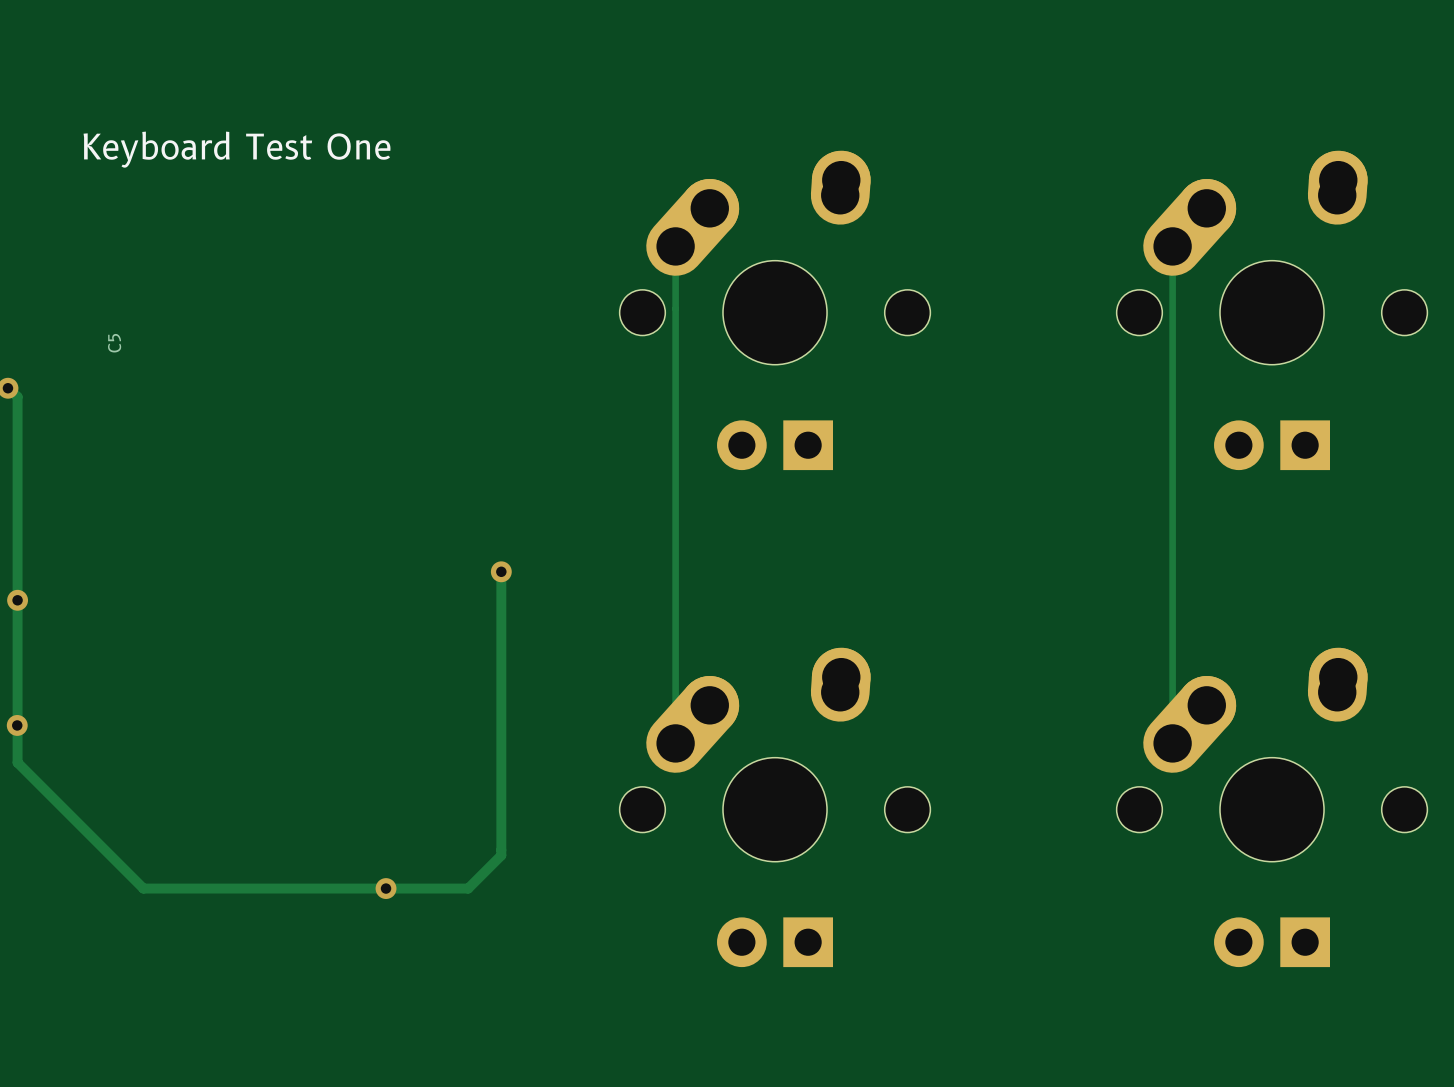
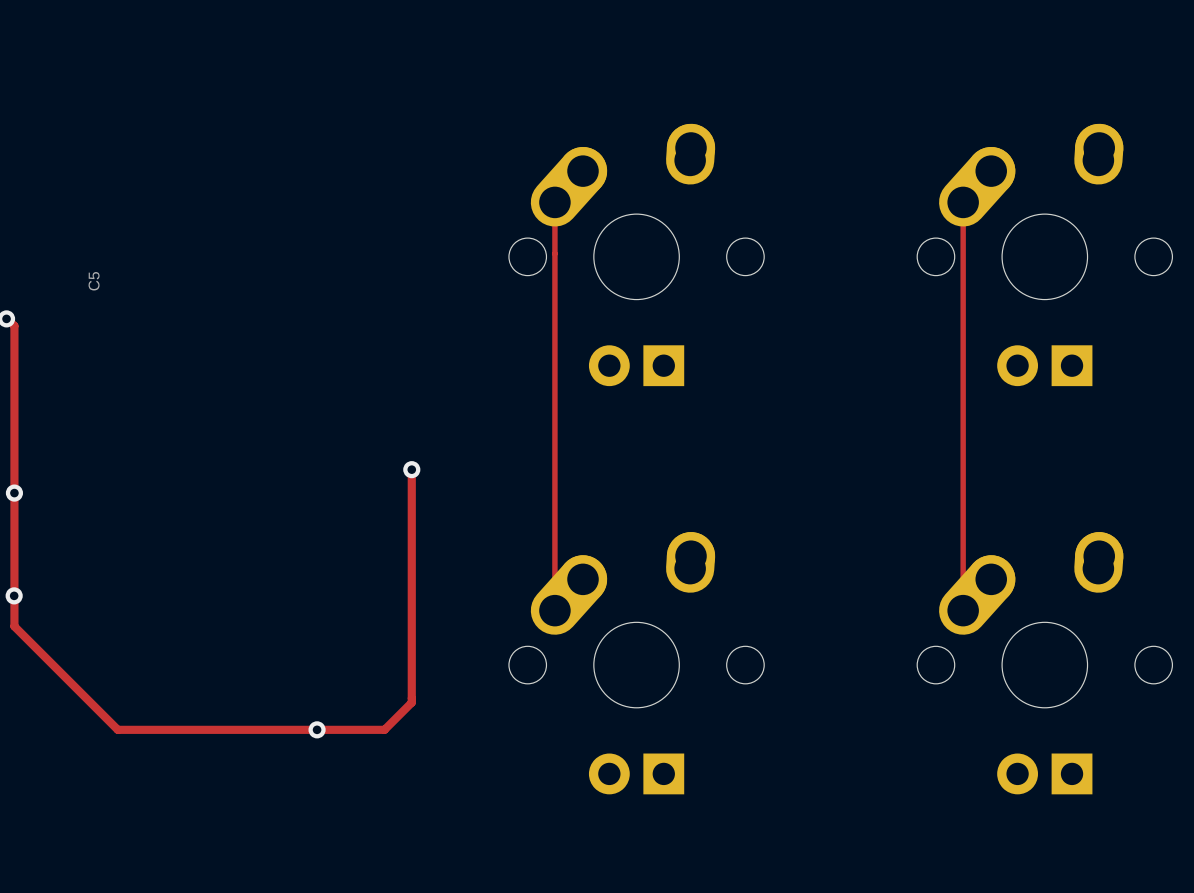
text: Keyboard Test One (237, 149) -> none

